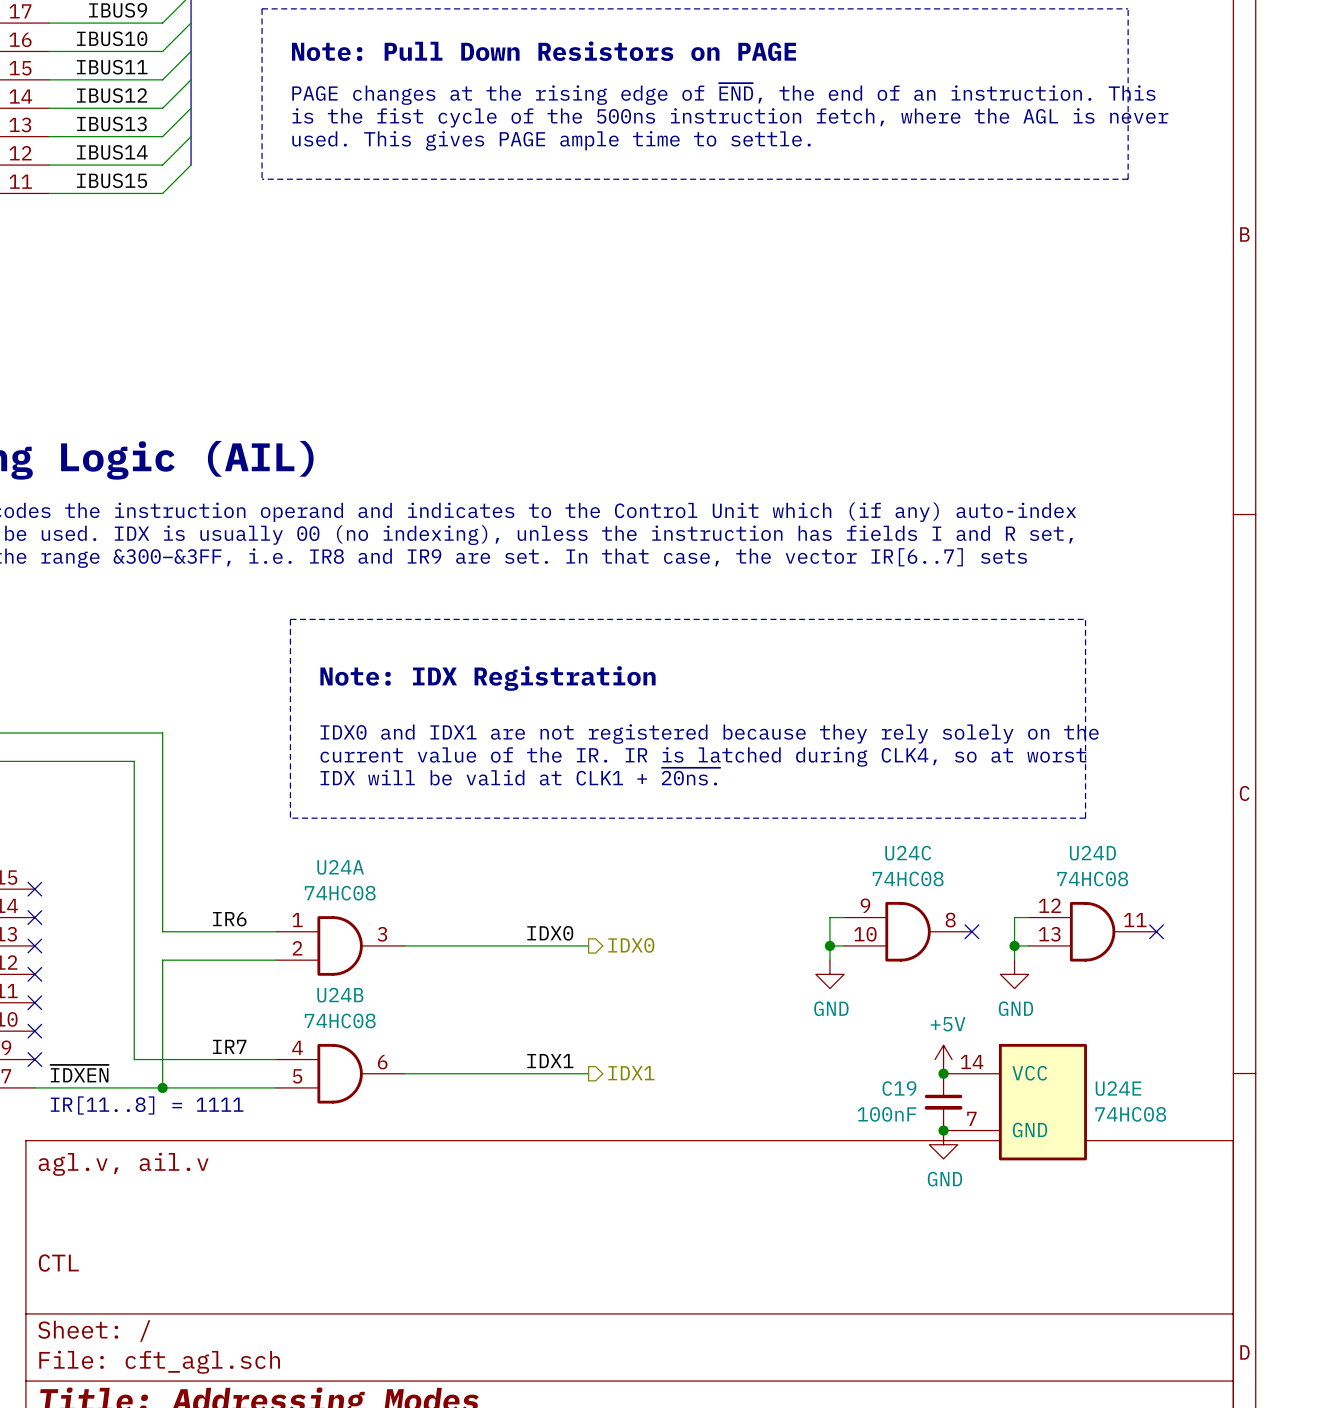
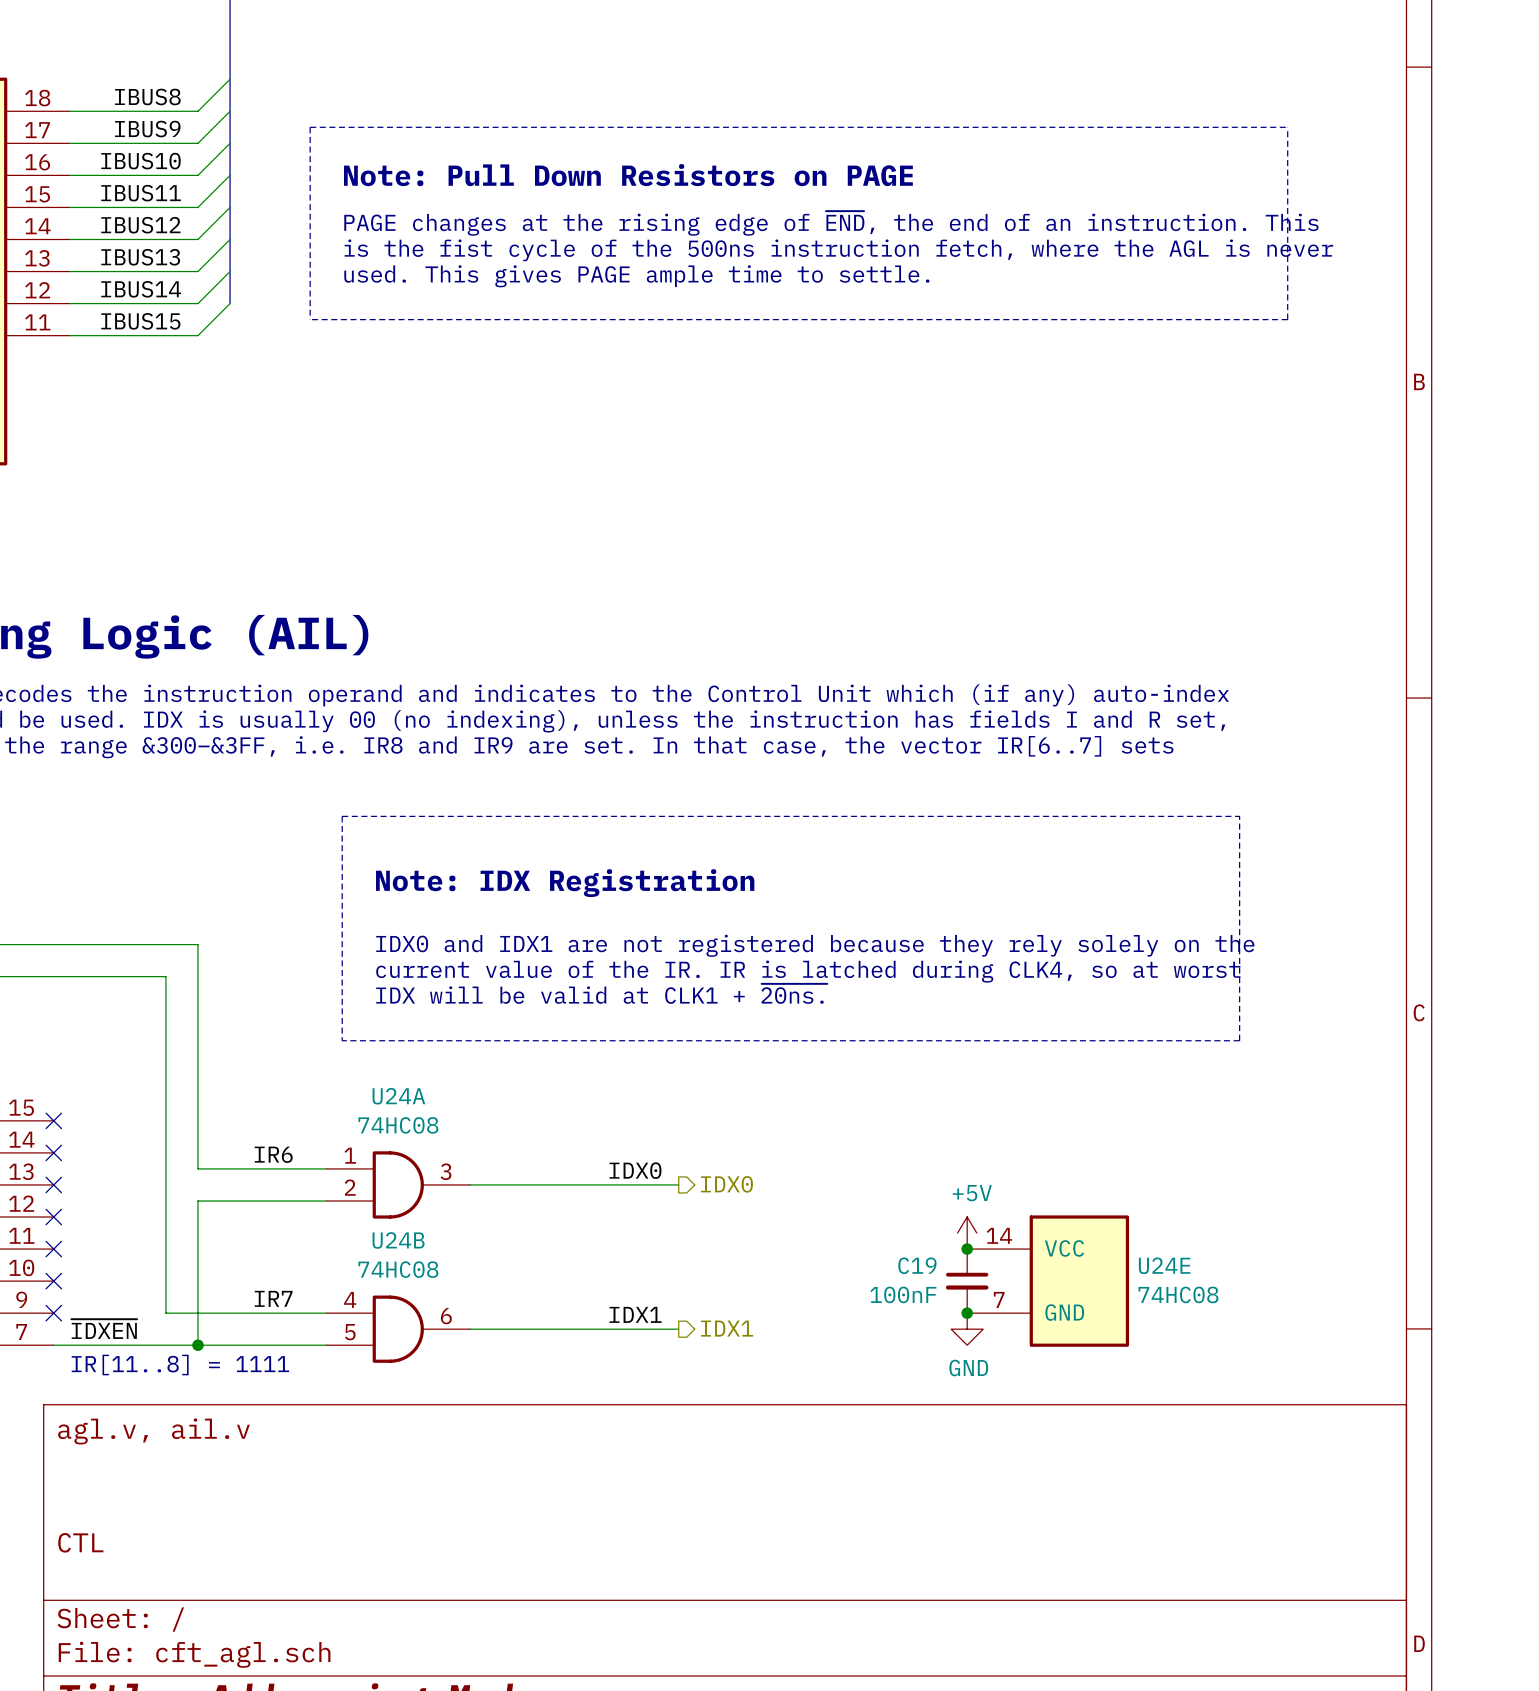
wire: (844, 917) (829, 917) (829, 960) -> none
wire: (1028, 917) (1014, 917) (1014, 960) -> none
U24C: 74HC08 (908, 931) -> none
no-connect mark: (971, 931) -> none
U24D: 74HC08 (1092, 931) -> none
no-connect mark: (1156, 931) -> none
wire: (829, 945) (844, 945) -> none
junction: (829, 945) -> none
wire: (1014, 945) (1028, 945) -> none
junction: (1014, 945) -> none
power symbol: GND (829, 974) -> none
power symbol: GND (1014, 974) -> none
junction: none -> (967, 1249)
junction: none -> (967, 1313)
power symbol position: +5V (943, 1059) -> +5V (967, 1233)
power symbol: none -> GND (967, 1329)
junction: (943, 1073) -> none
C19 position: (943, 1102) -> (967, 1281)
U24E position: (1015, 1102) -> (1048, 1281)
junction: (943, 1130) -> none
power symbol: GND (943, 1144) -> none

